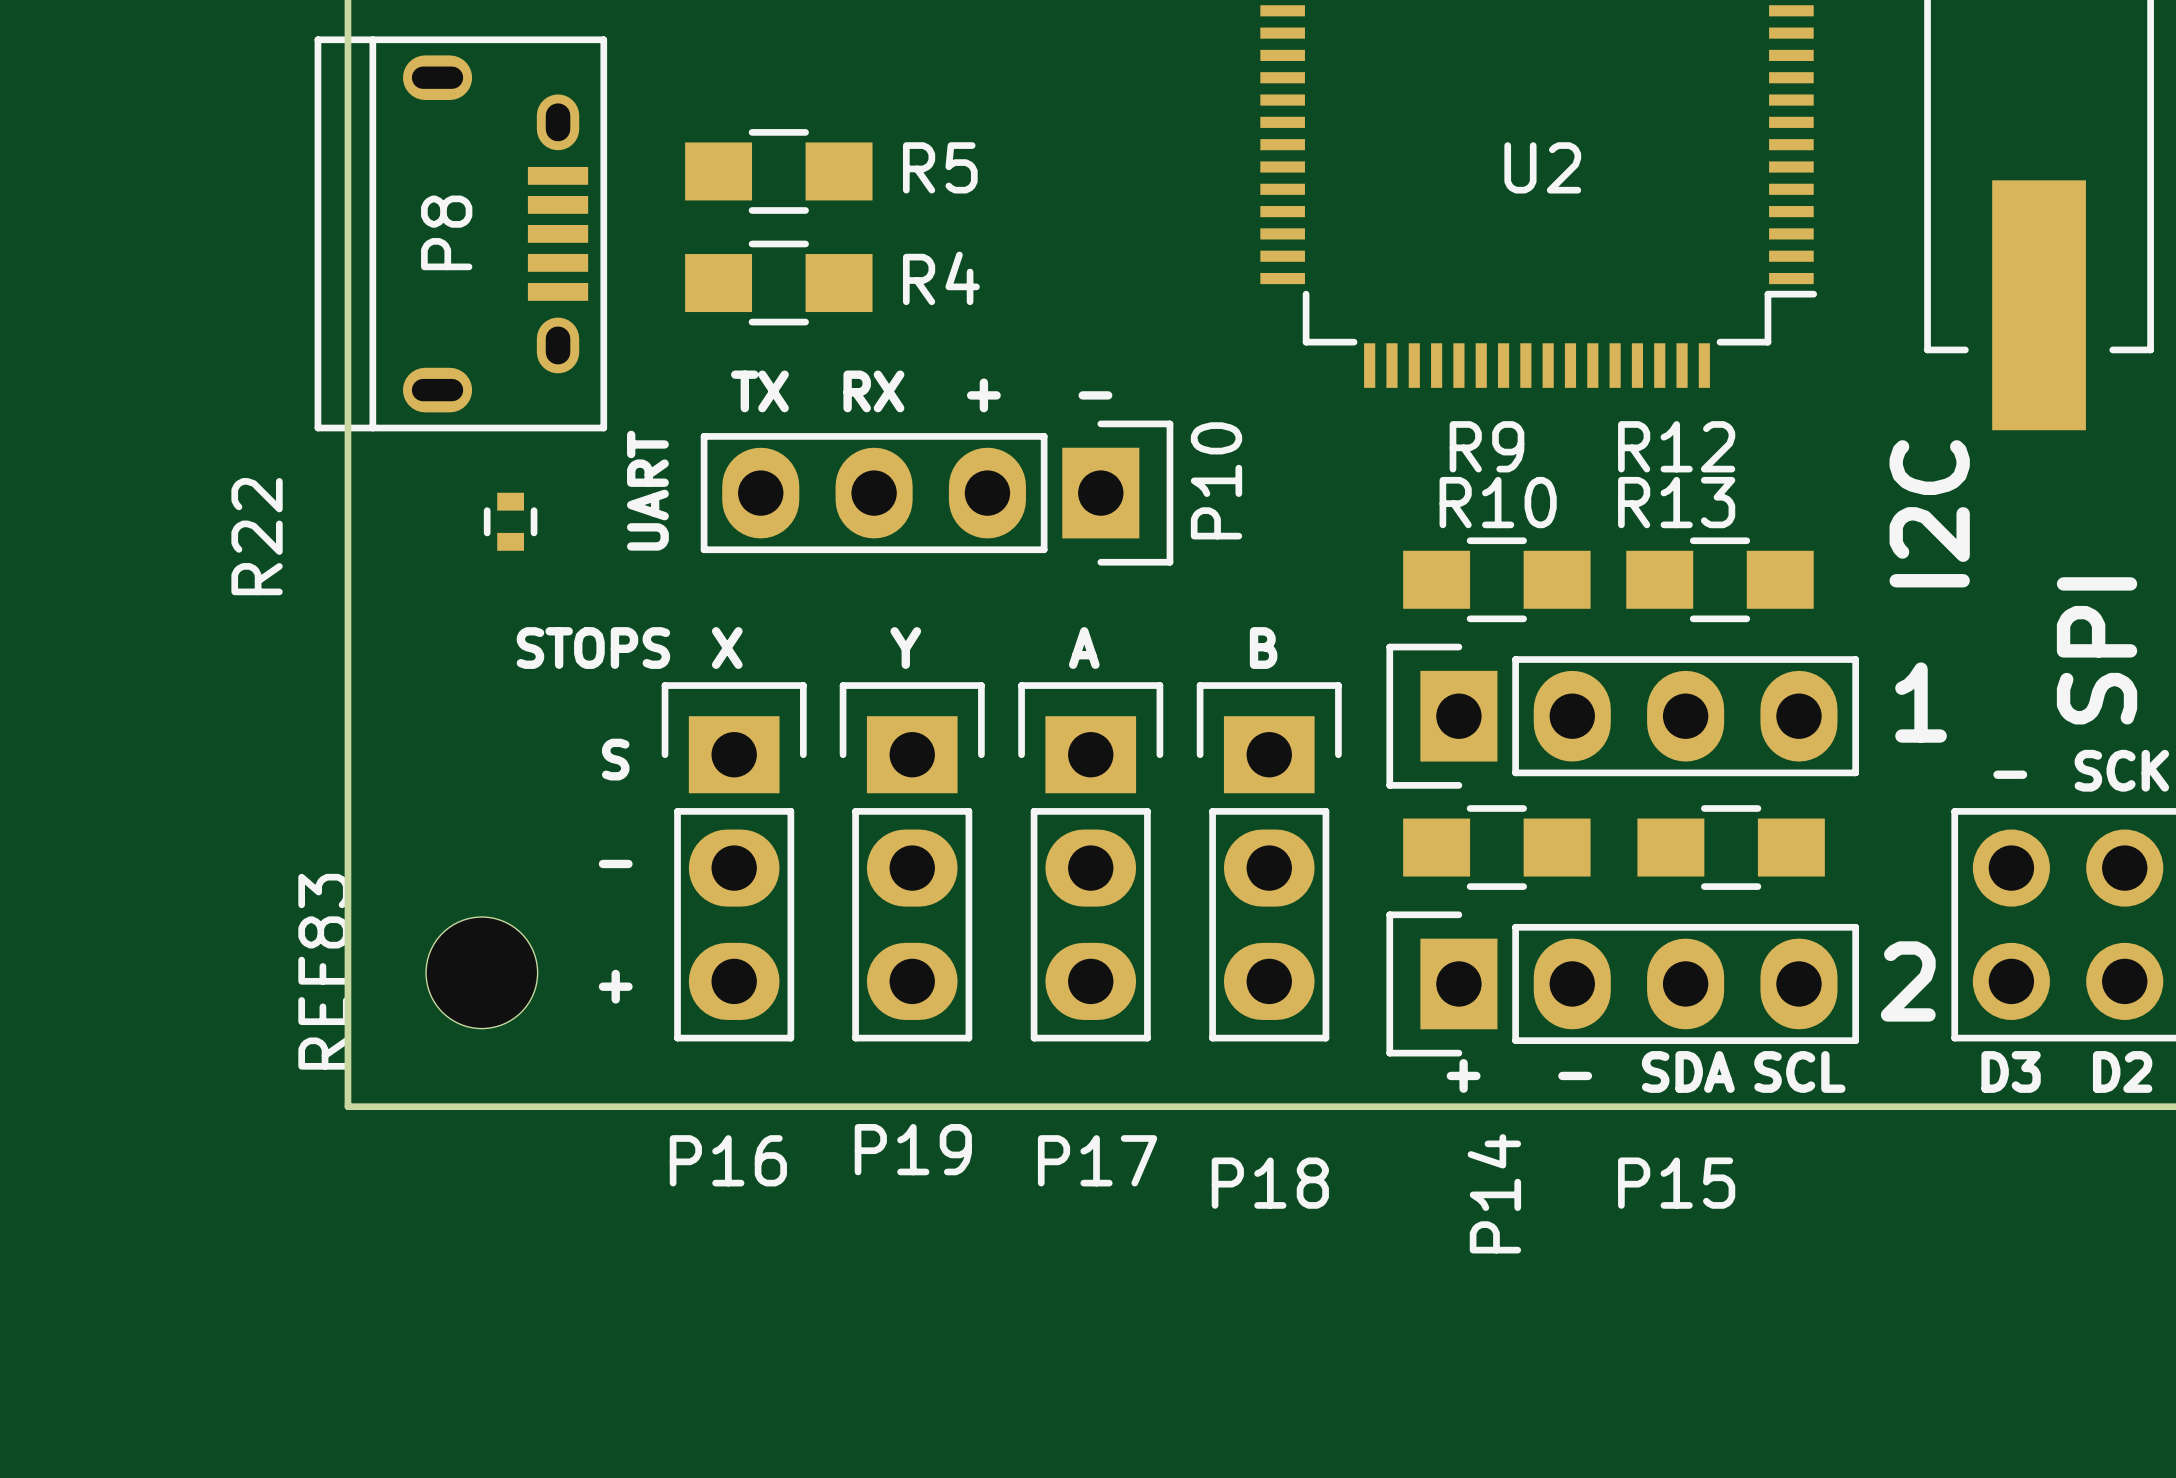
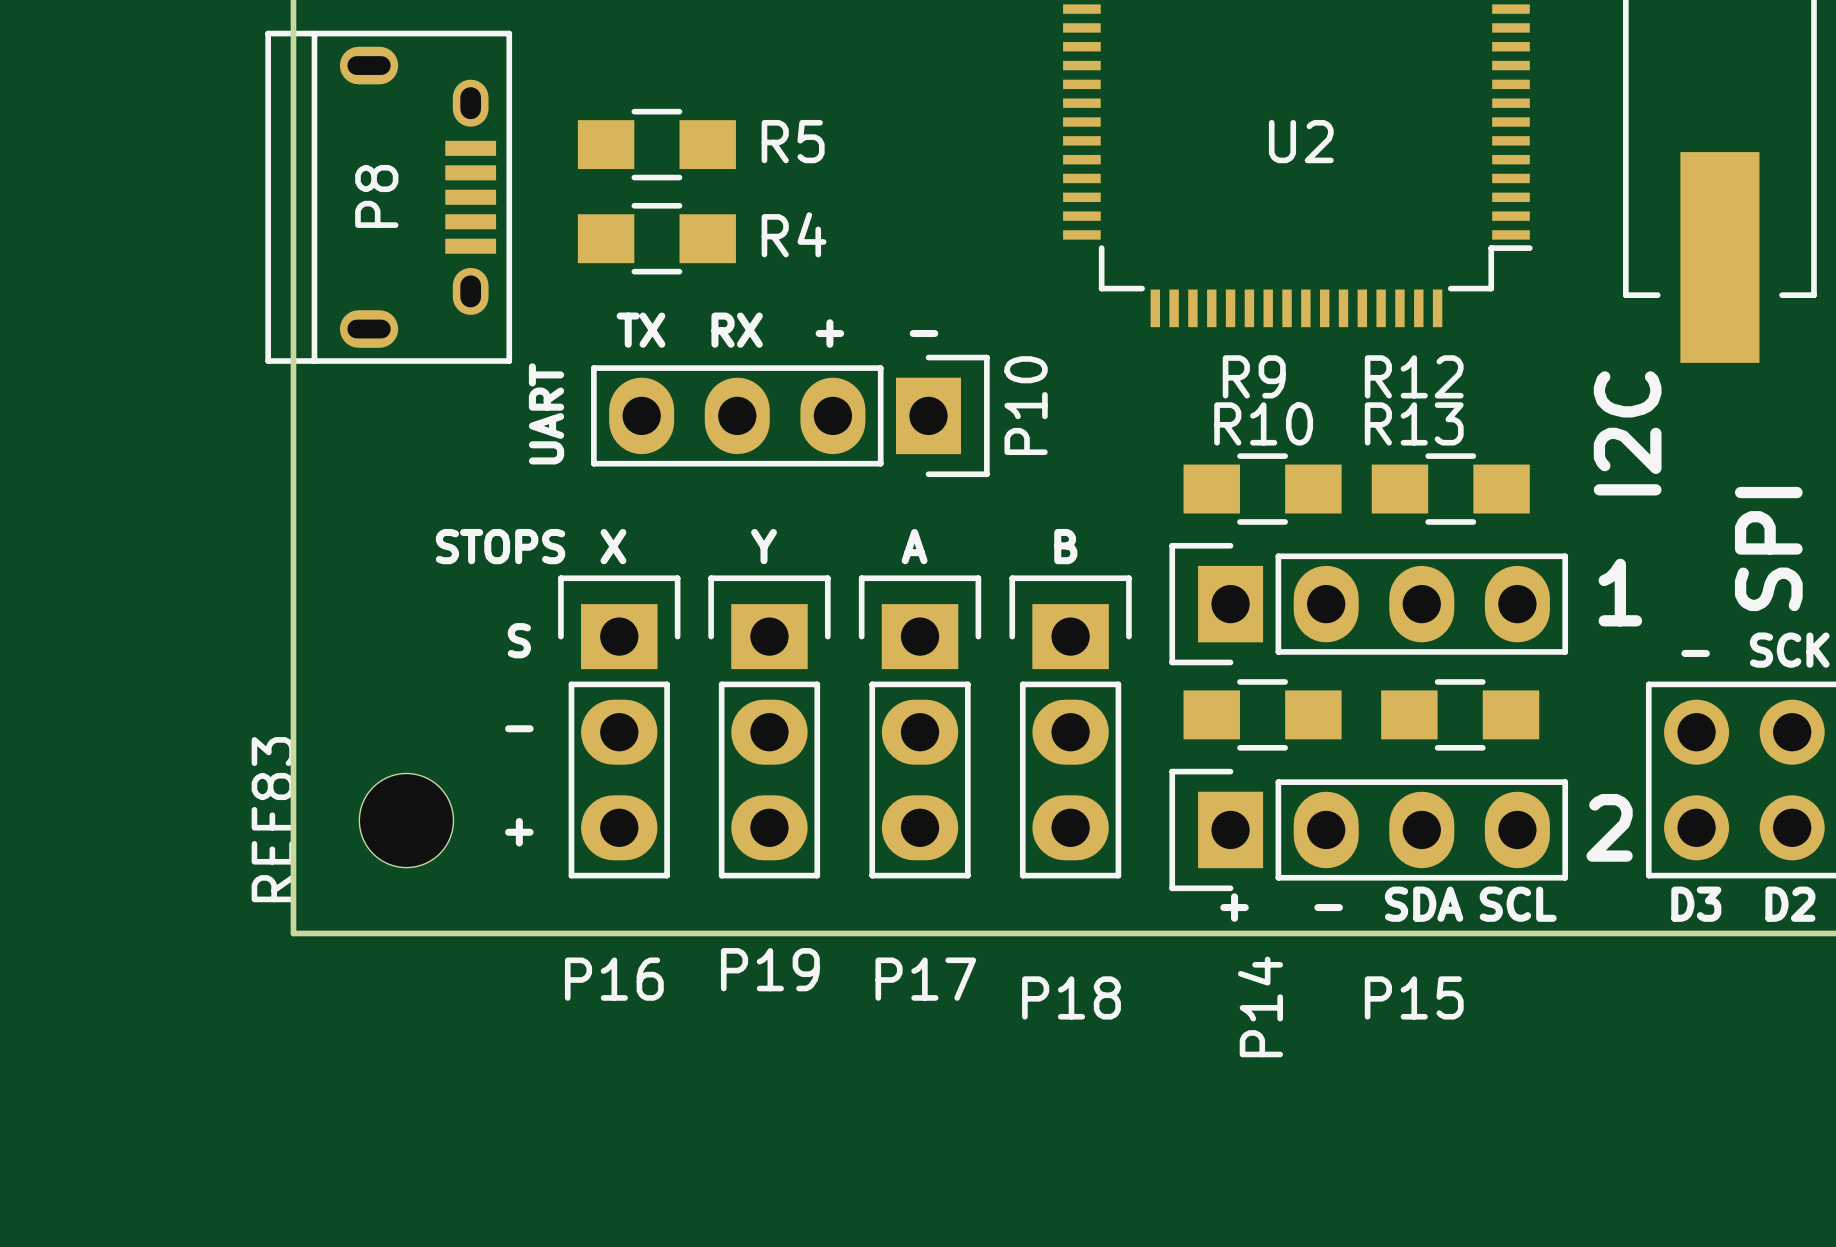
R22: (510, 521) -> none

